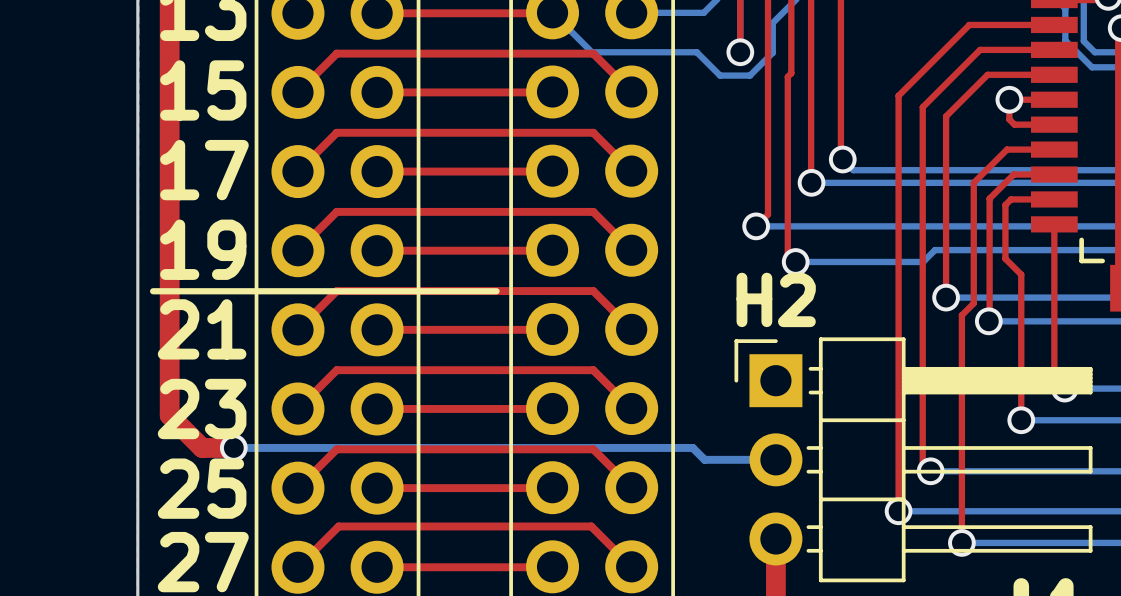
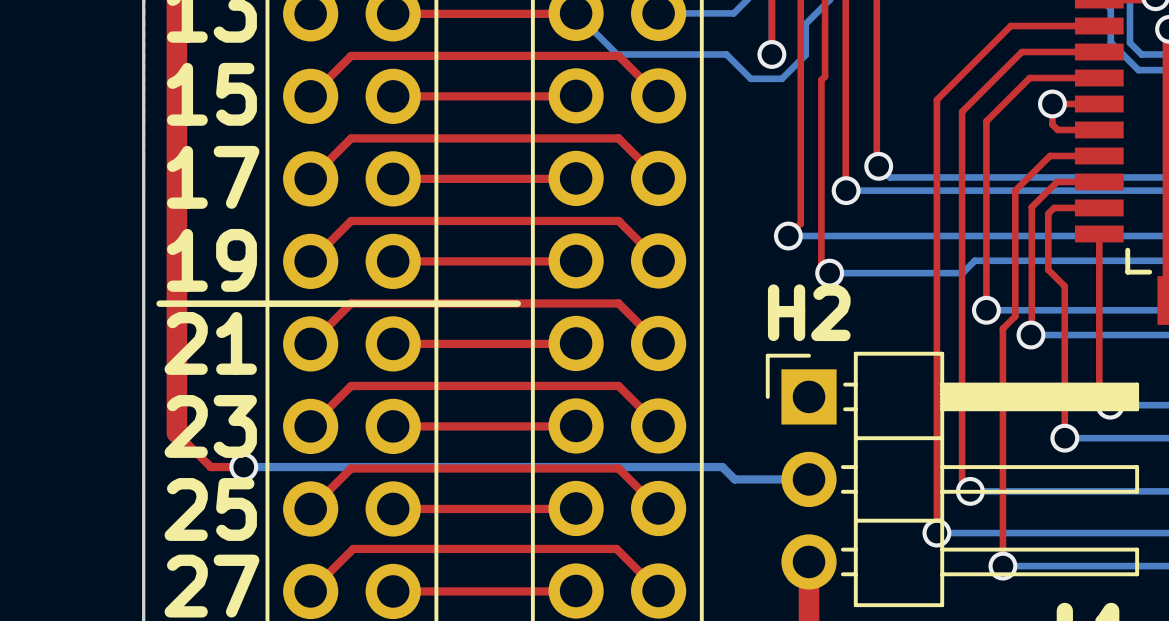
top track width: thick (169, 415) (202, 447) (233, 447) -> thin (176, 433) (210, 467) (243, 467)

